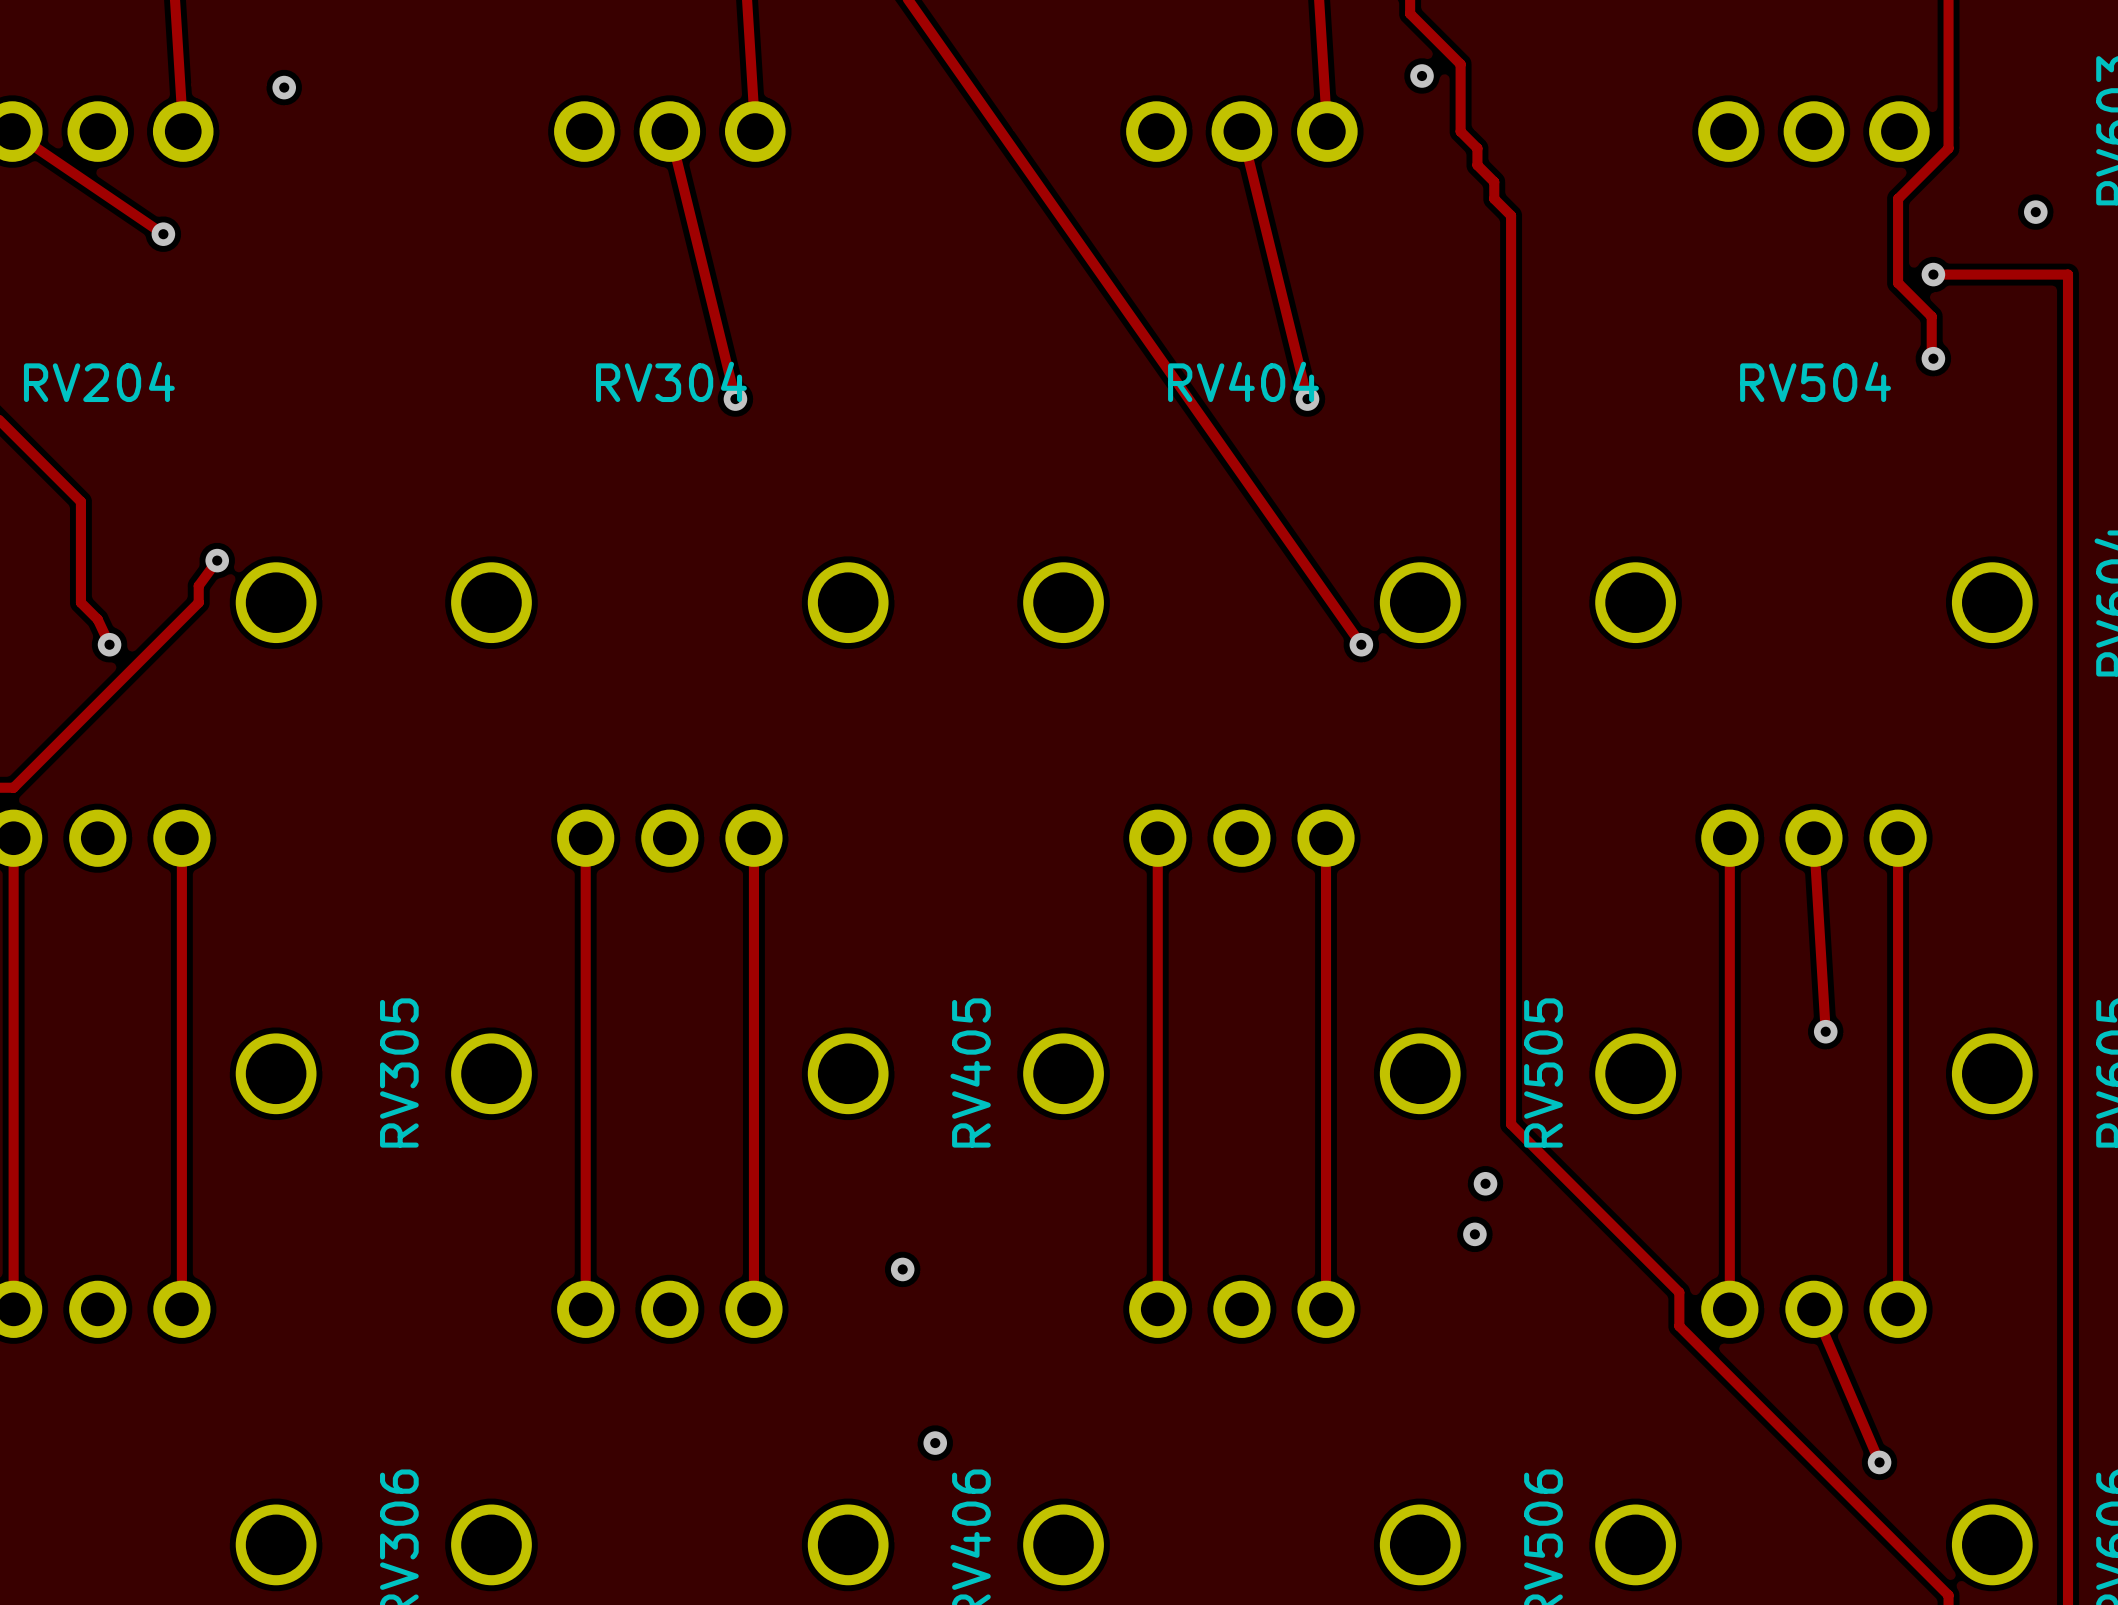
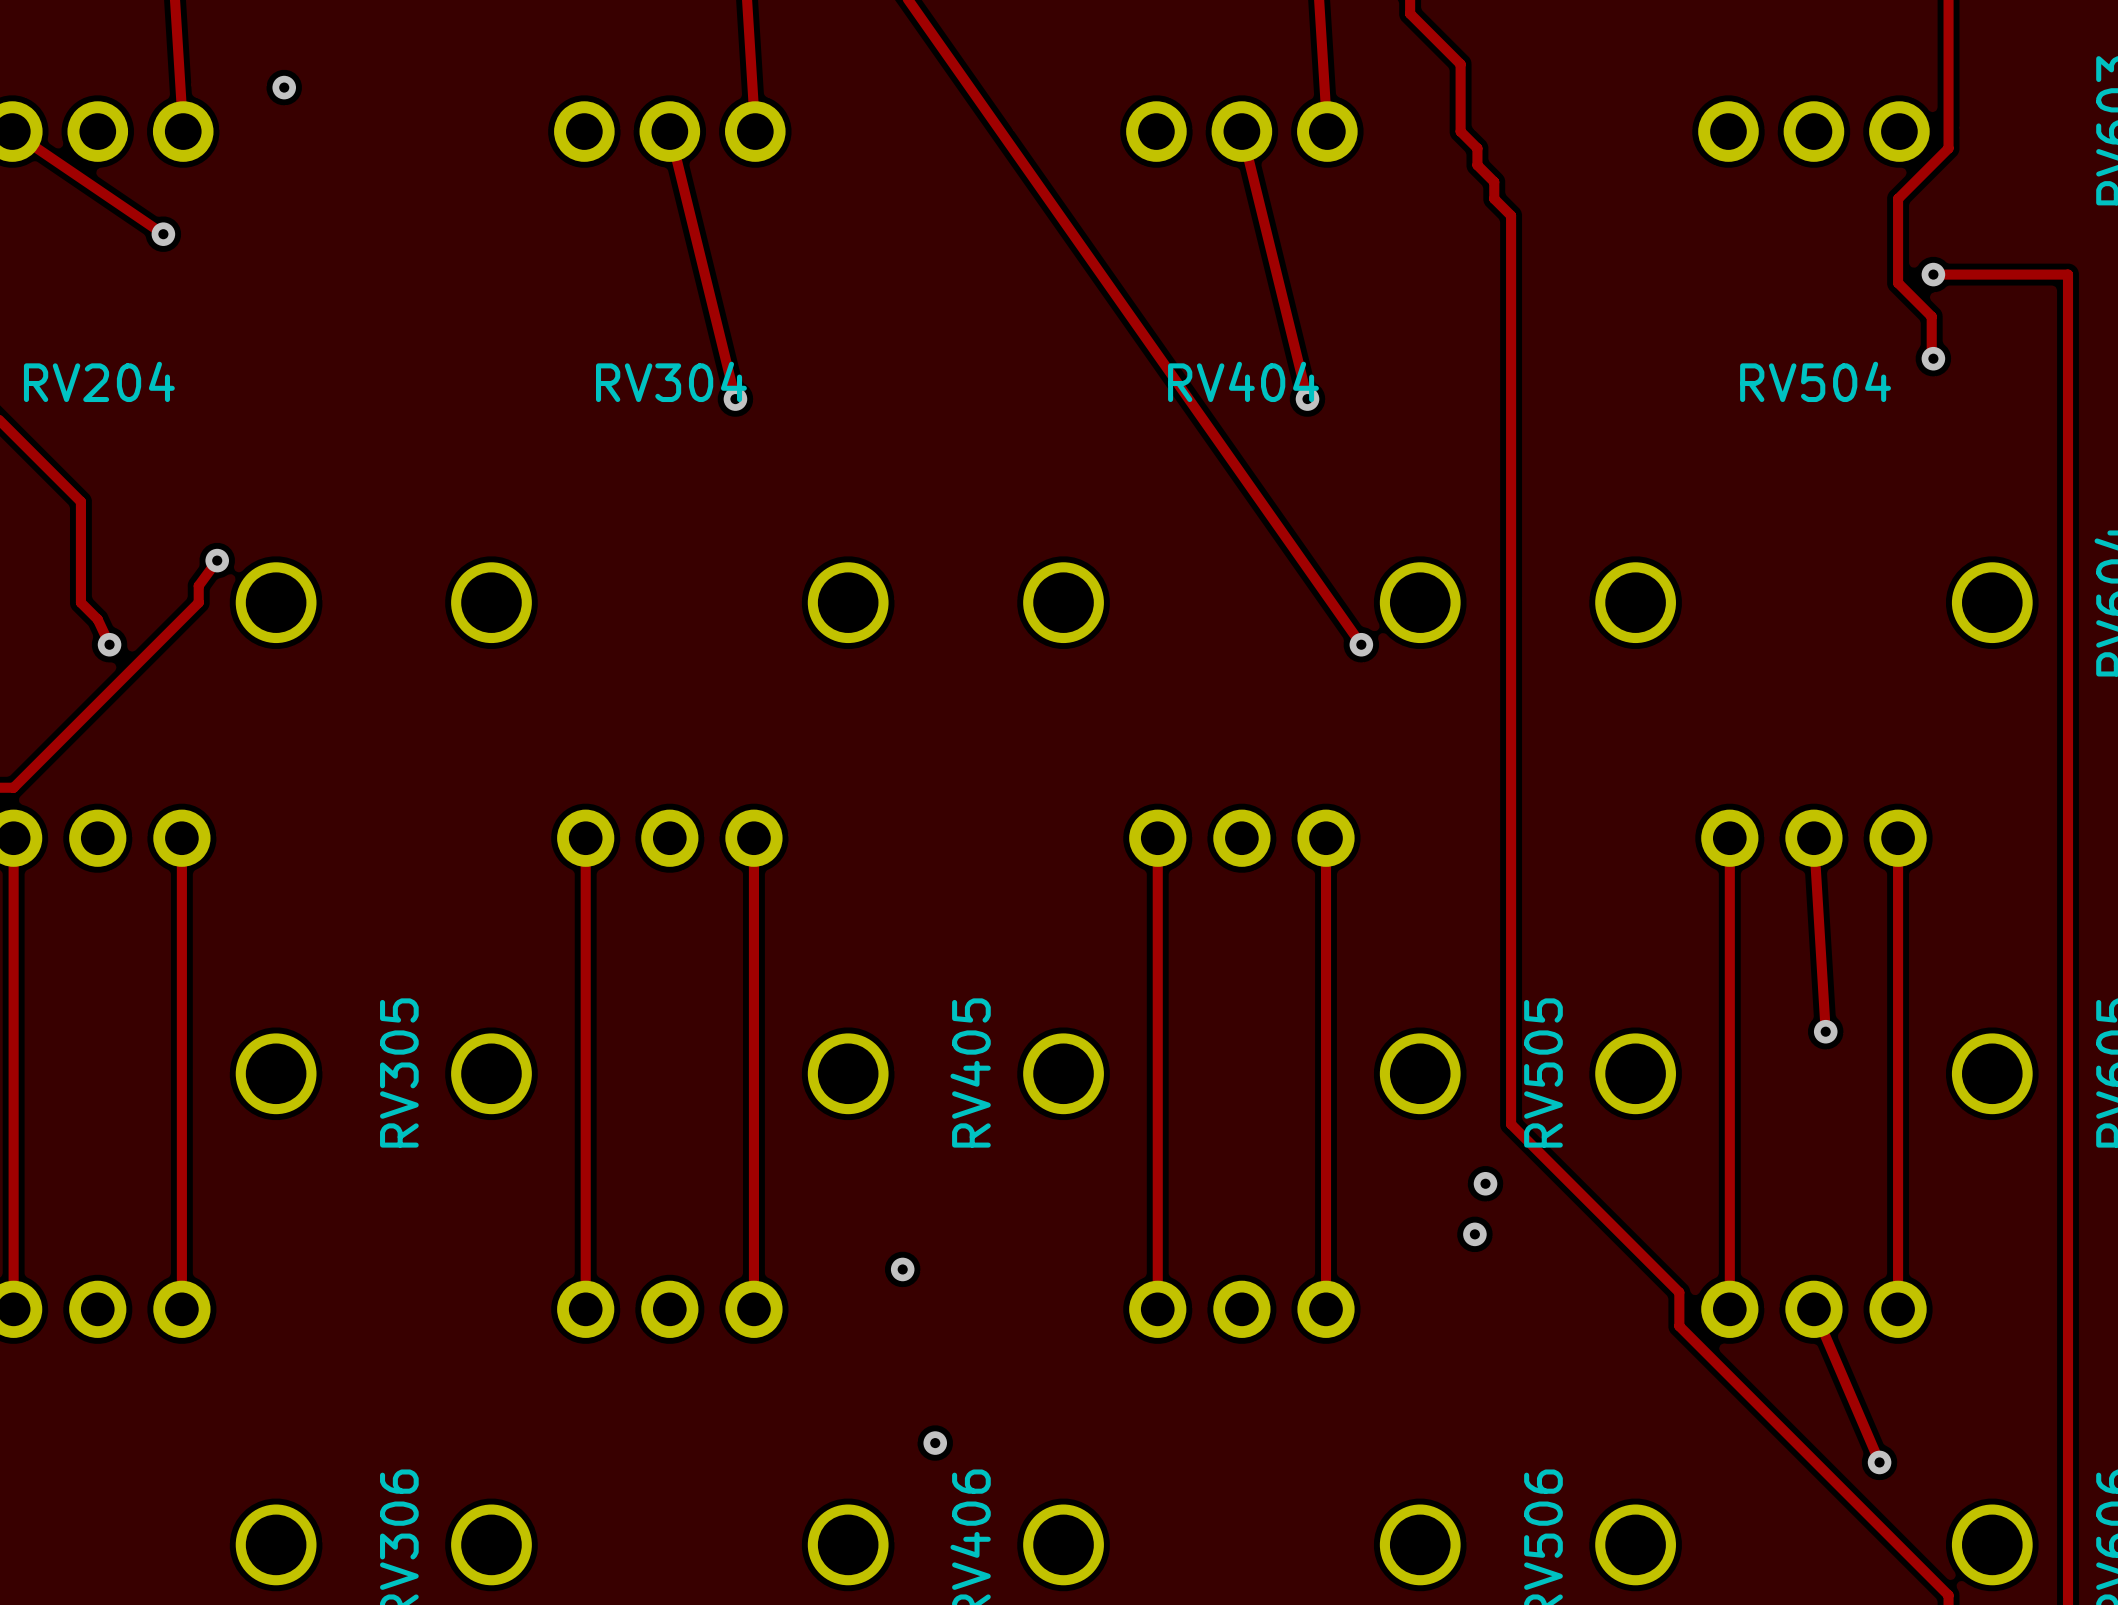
via: (1422, 75) -> none
via: (2035, 212) -> none

